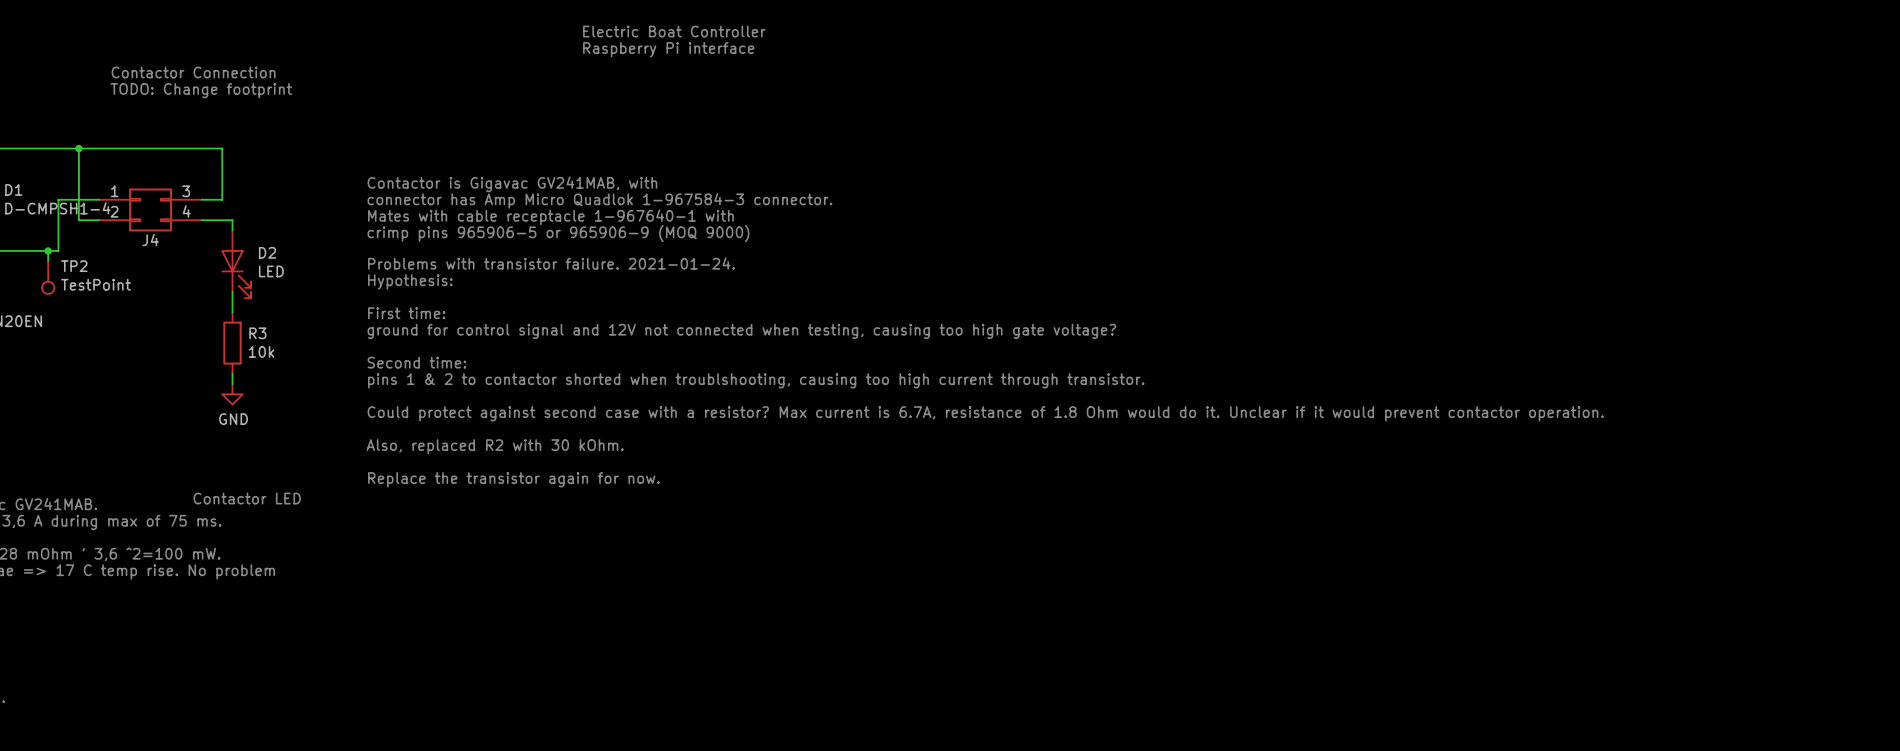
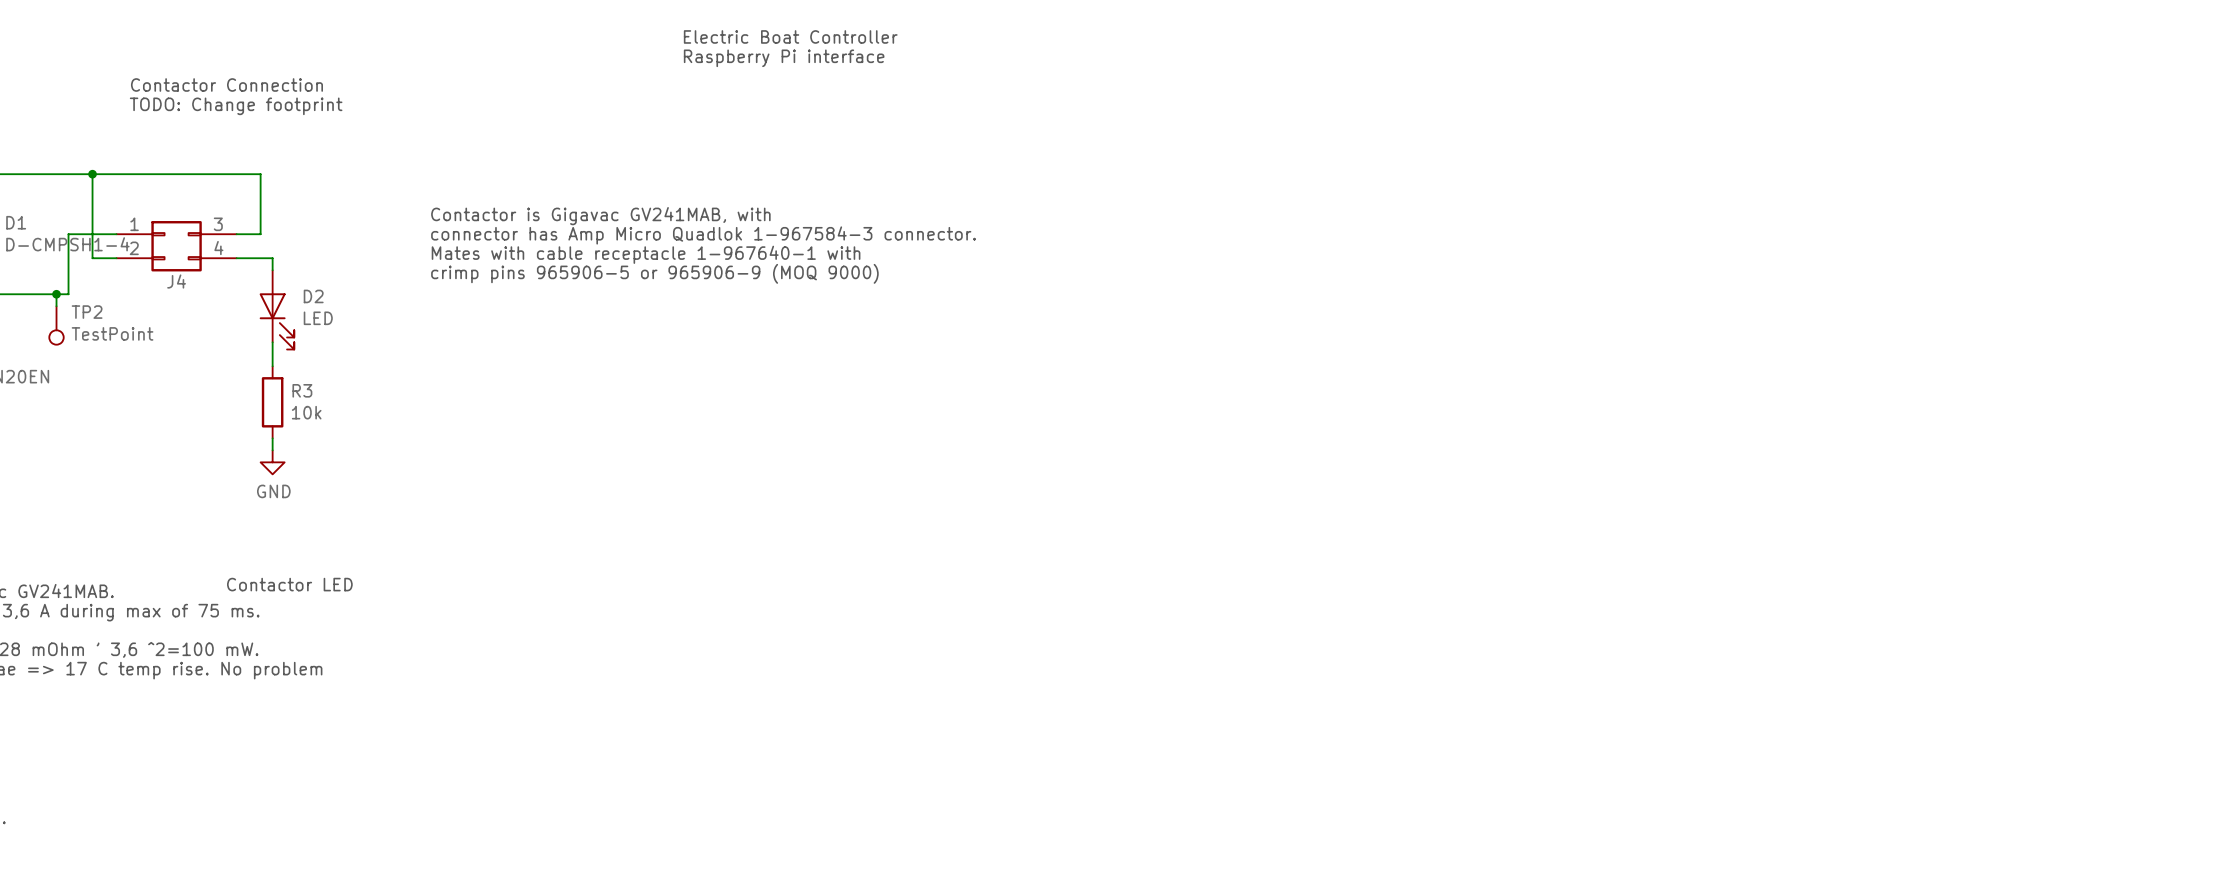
text: Problems with transistor failure. 2021-01-24. (551, 263) -> none
text: Hypothesis: (410, 281) -> none
text: First time: (406, 313) -> none
text: ground for control signal and 12V not connected when testing, causing too high gate voltage? (741, 331) -> none
text: Second time: (416, 362) -> none
text: pins 1 & 2 to contactor shorted when troublshooting, causing too high current through transistor. (756, 380) -> none
text: Could protect against second case with a resistor? Max current is 6.7A, resistance of 1.8 Ohm would do it. Unclear if it would prevent contactor operation. (985, 413) -> none
text: Also, replaced R2 with 30 kOhm. (495, 446) -> none
text: Replace the transistor again for now. (513, 479) -> none

